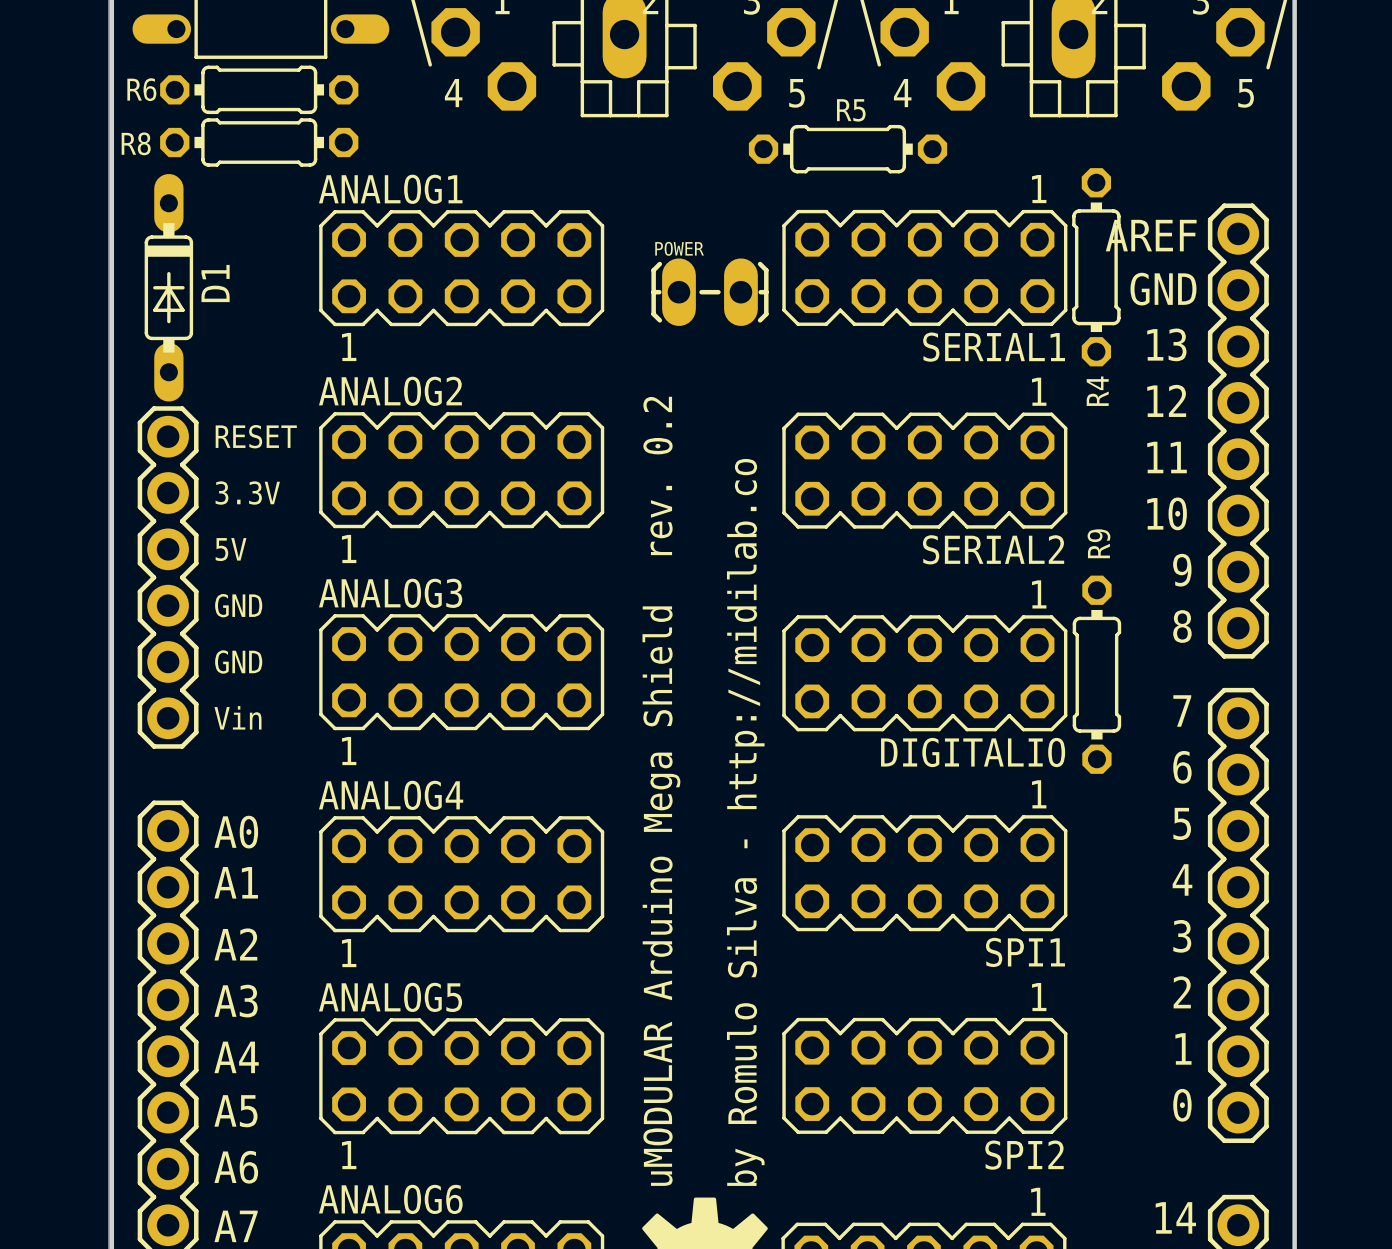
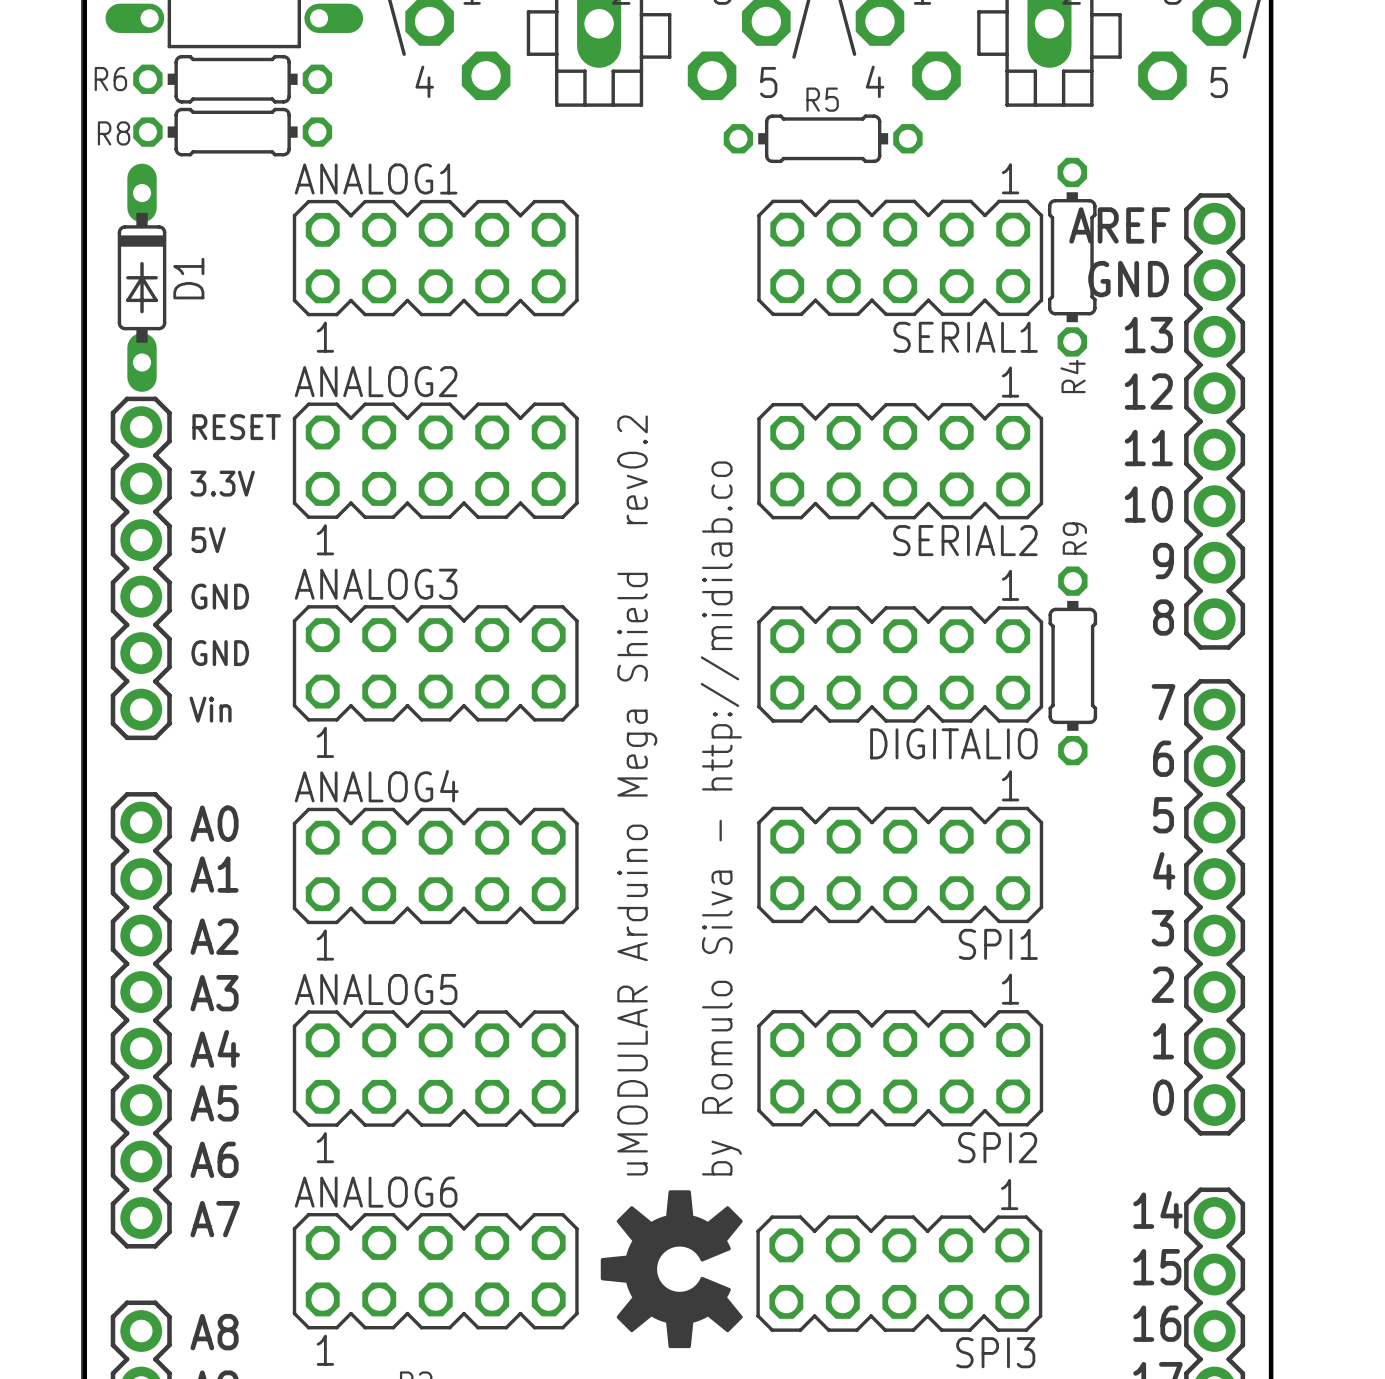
POWER: (709, 292) -> none
text: uMODULAR Arduino Mega Shield rev. 0.2 (661, 791) -> uMODULAR Arduino Mega Shield rev0.2 (637, 795)

